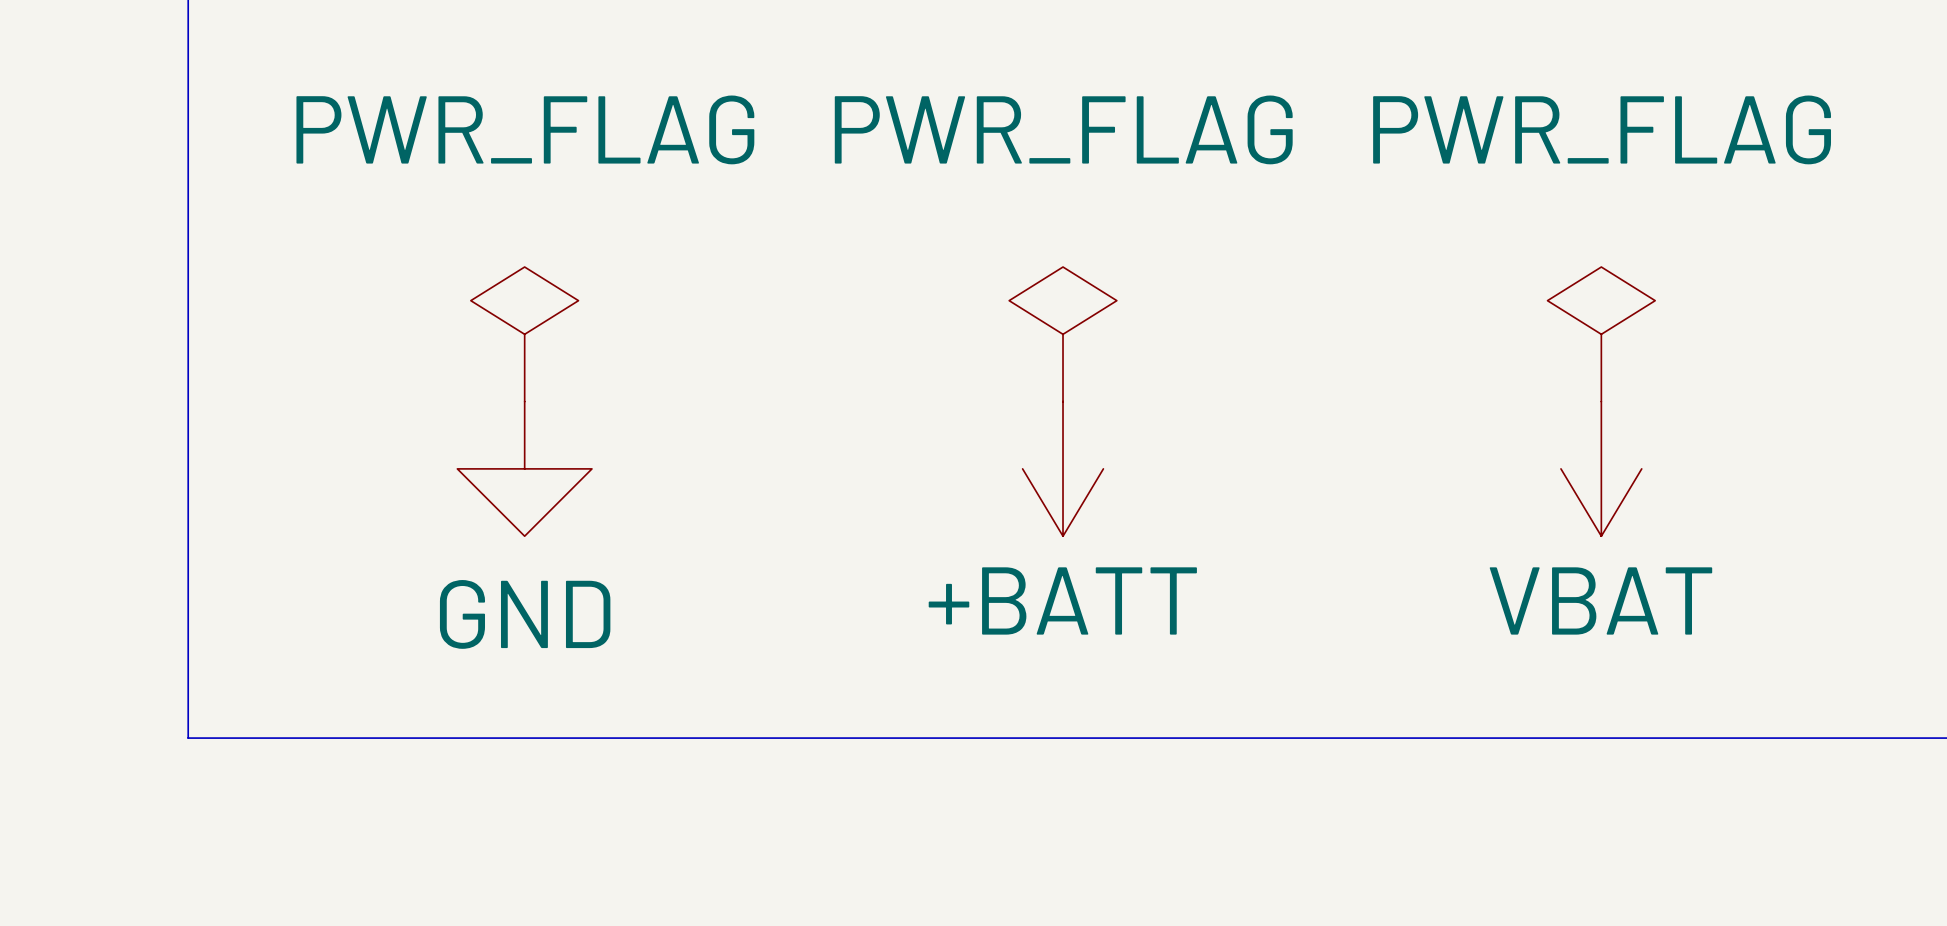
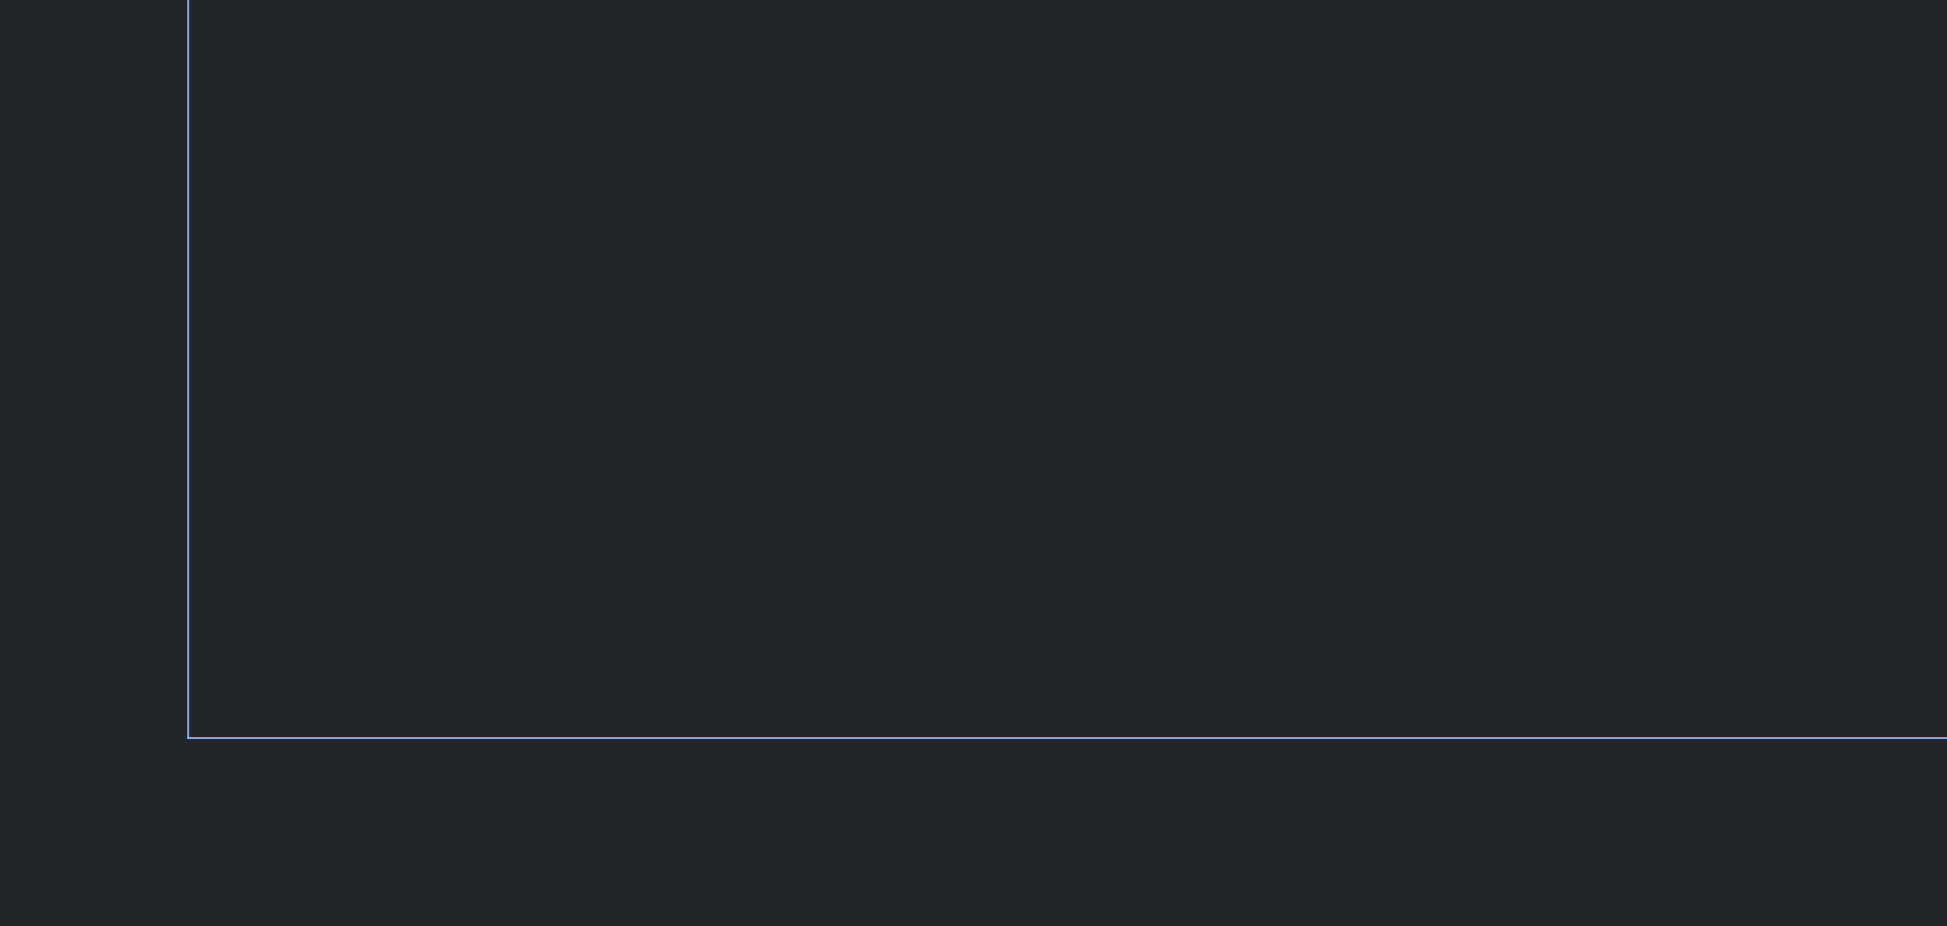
power symbol: PWR_FLAG (524, 334) -> none
power symbol: PWR_FLAG (1063, 334) -> none
power symbol: PWR_FLAG (1601, 334) -> none
power symbol: GND (524, 468) -> none
power symbol: +BATT (1063, 468) -> none
power symbol: VBAT (1601, 468) -> none

